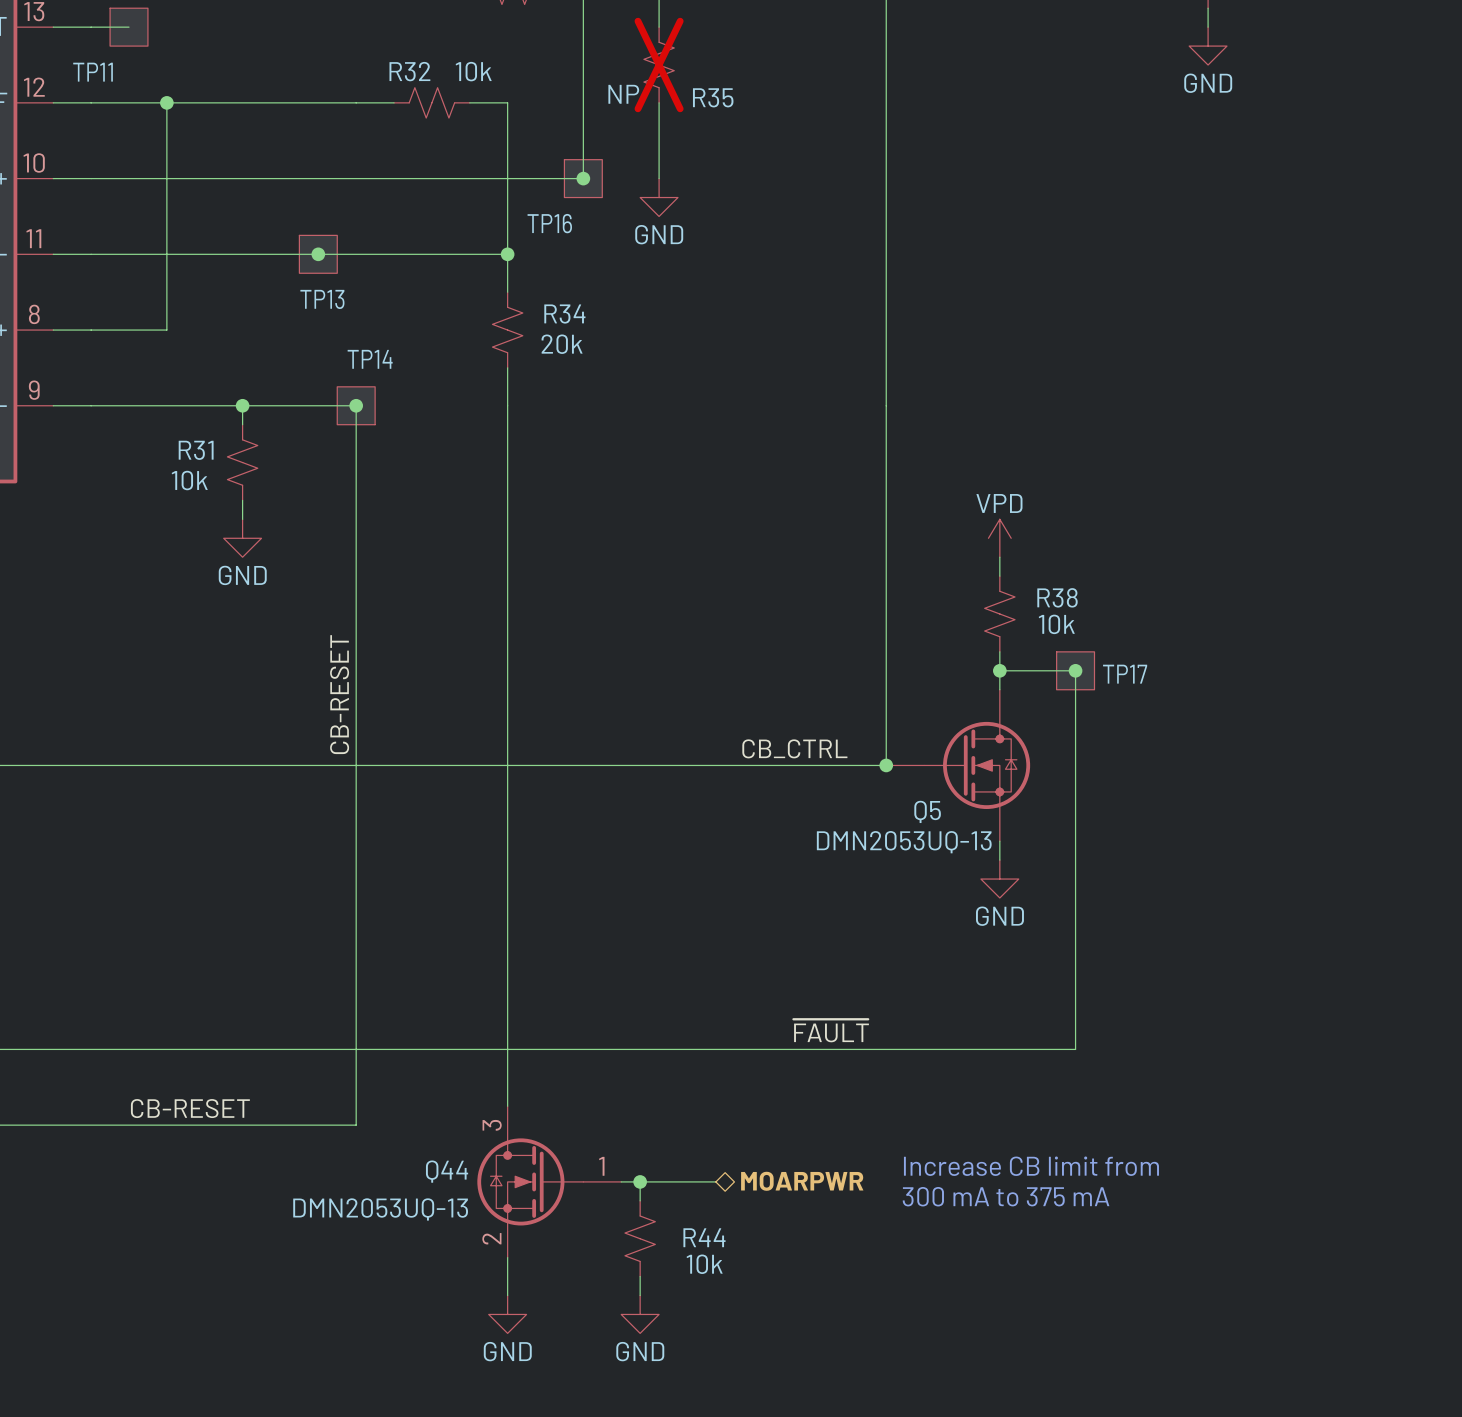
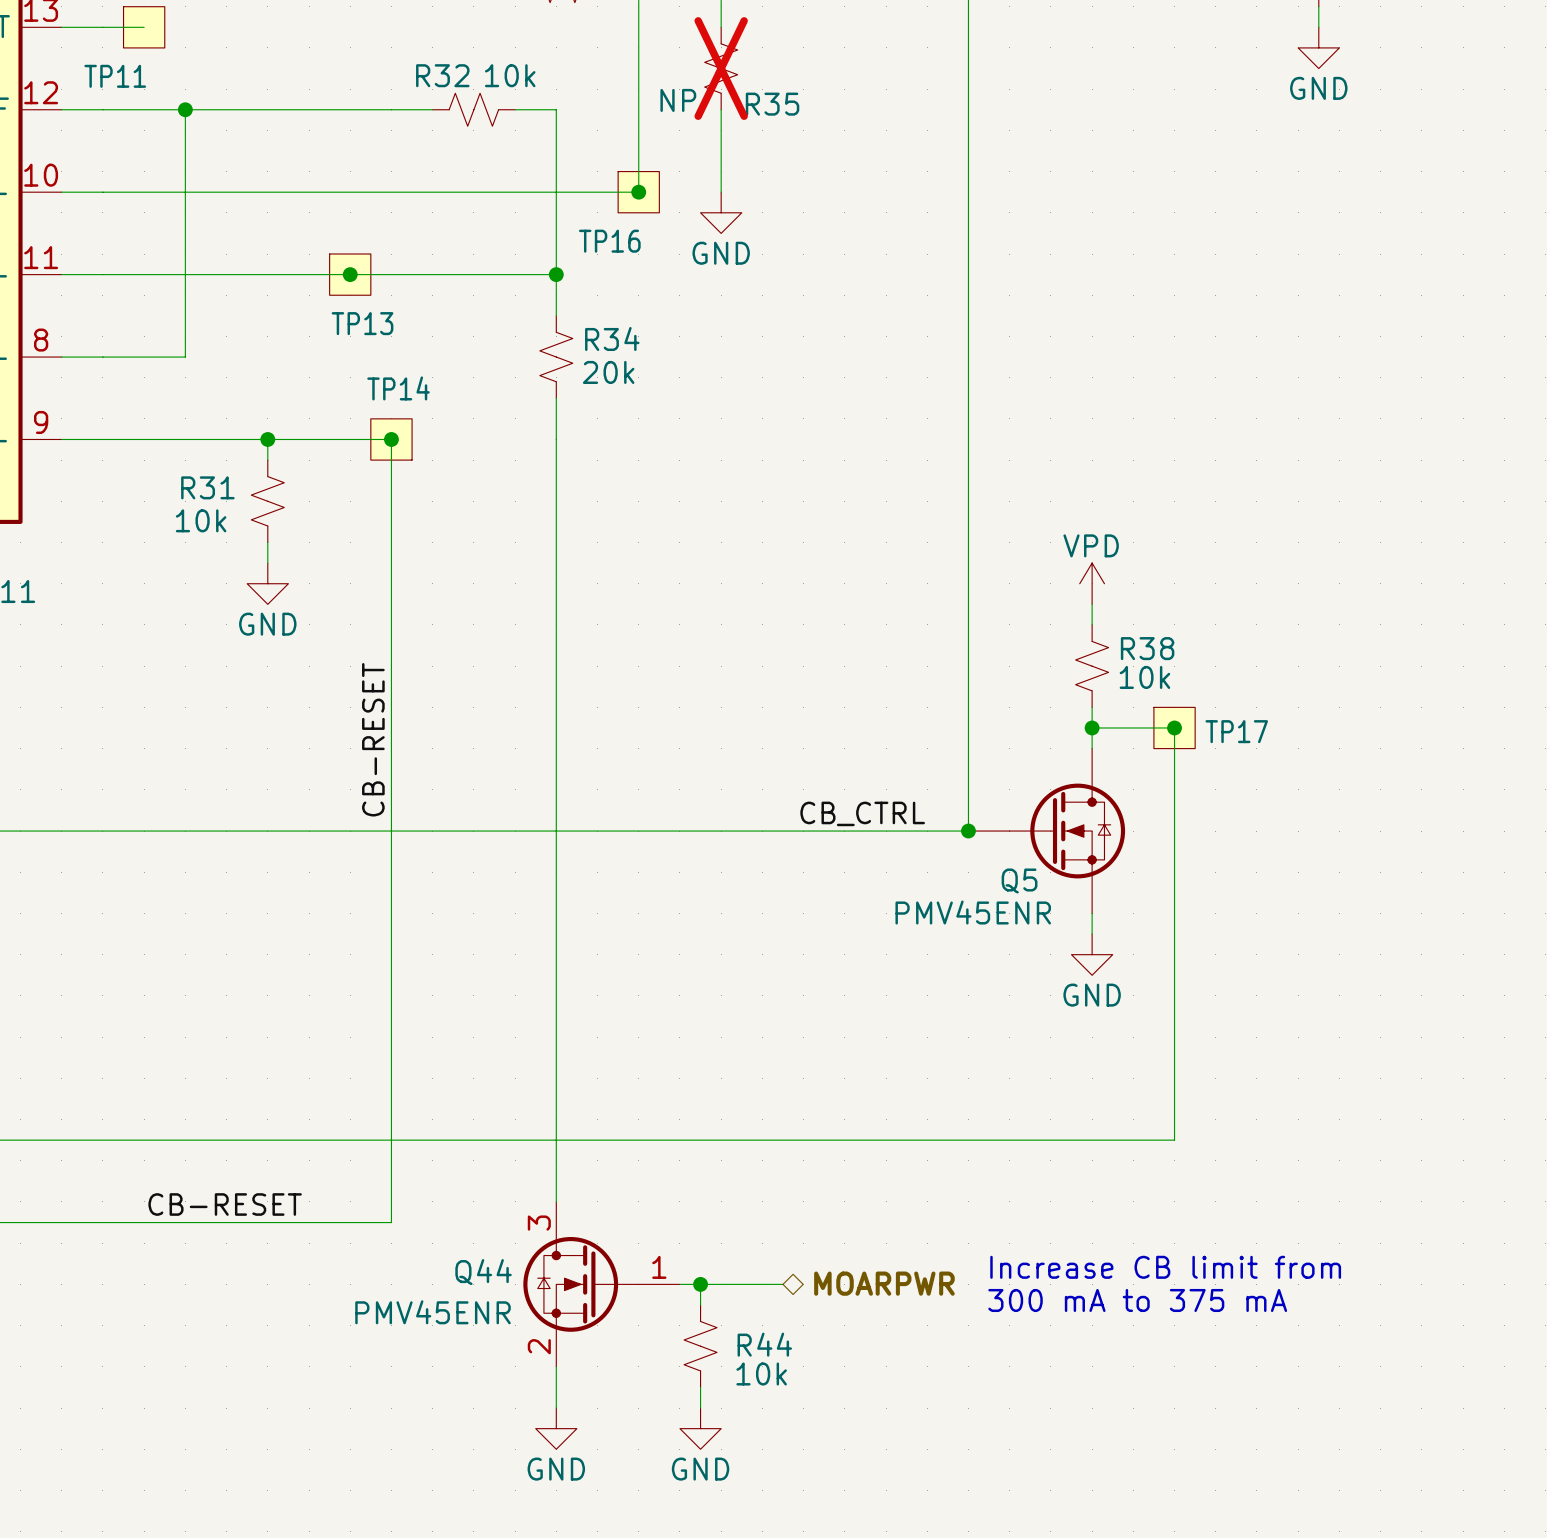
Q5 value: DMN2053UQ-13 (904, 842) -> PMV45ENR (973, 912)
label: ~{FAULT} (831, 1030) -> none
Q44 value: DMN2053UQ-13 (380, 1209) -> PMV45ENR (433, 1312)

